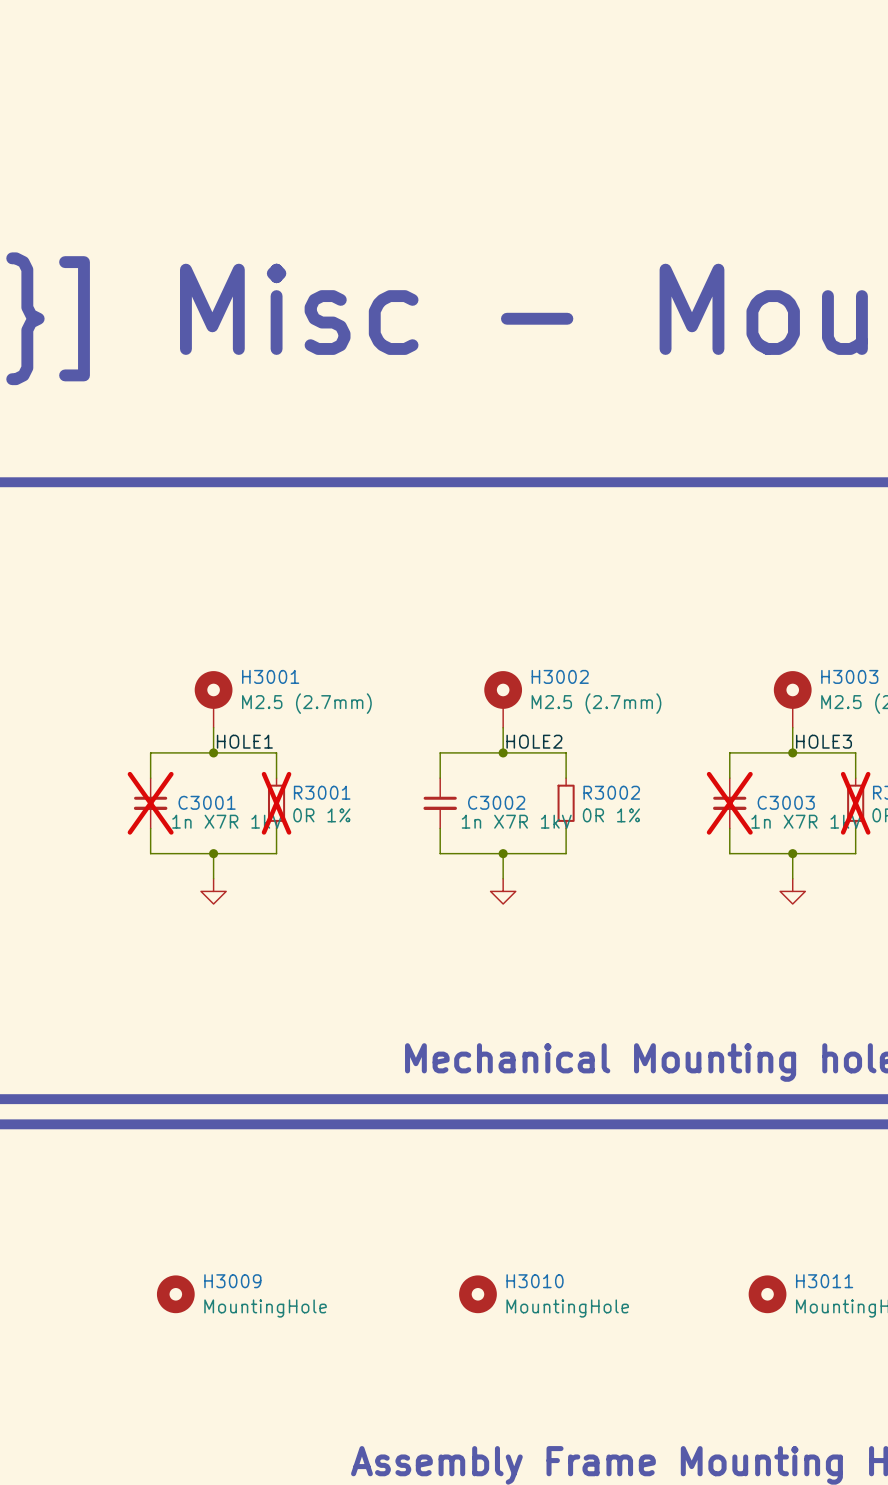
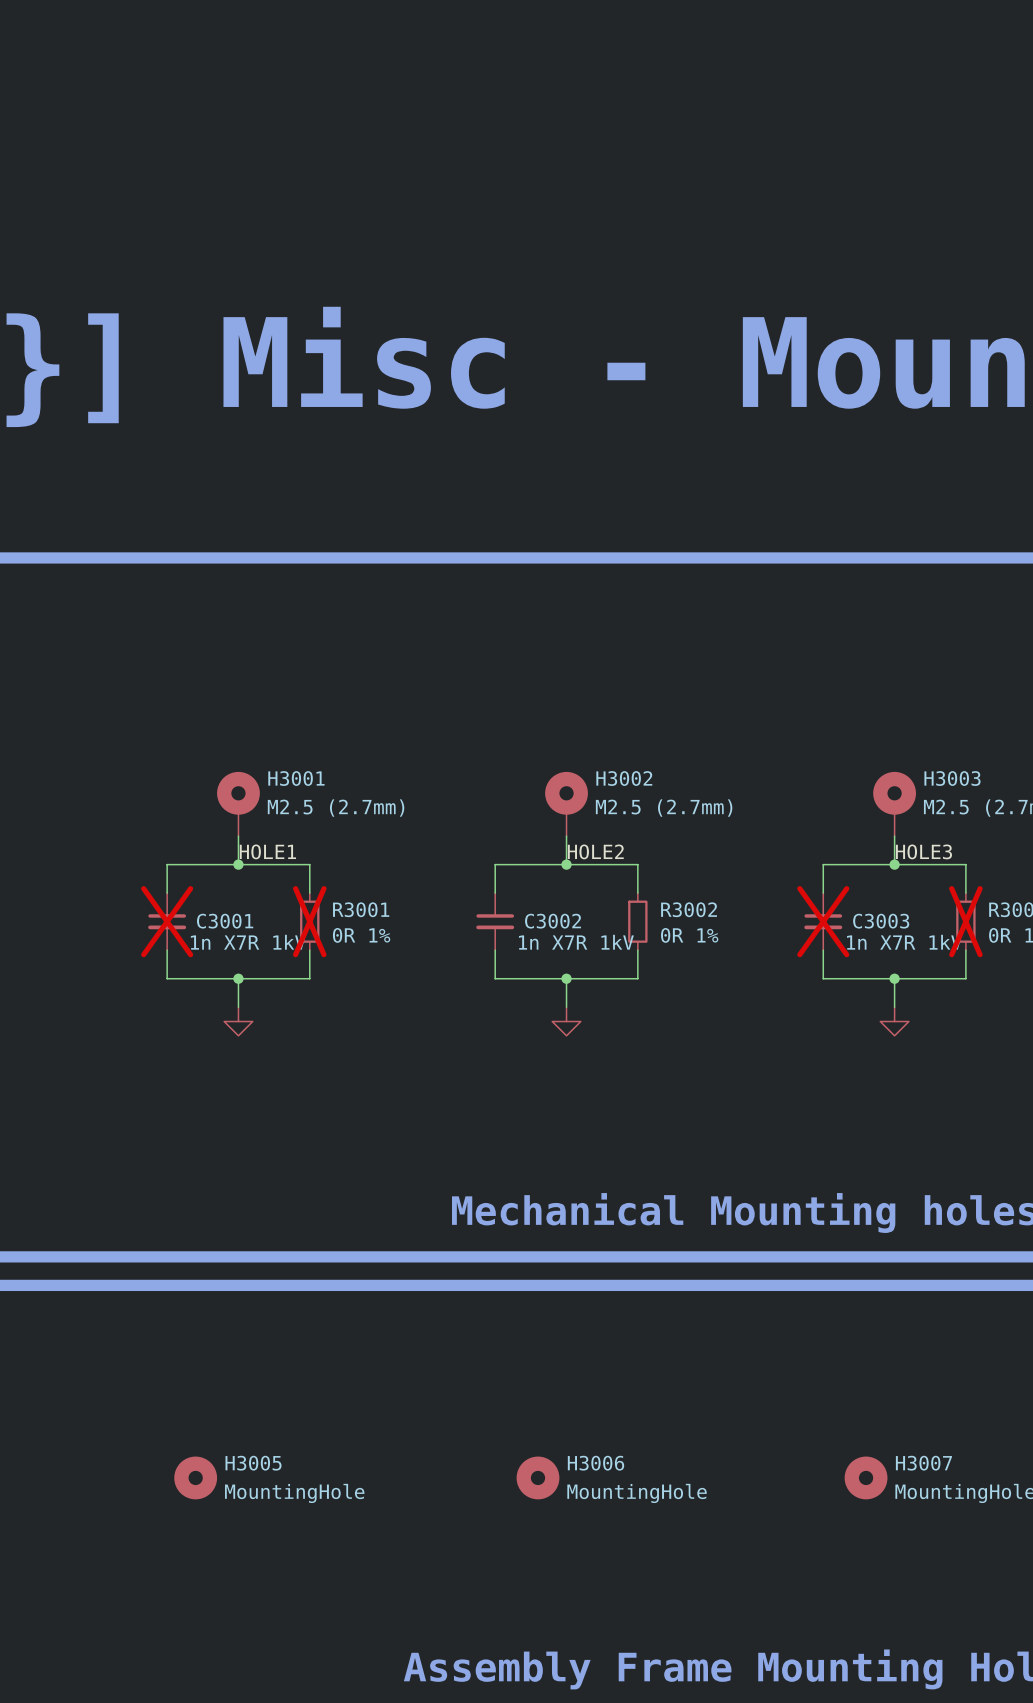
H3009 name: H3009 (232, 1281) -> H3005 (253, 1463)
H3010 name: H3010 (535, 1281) -> H3006 (595, 1463)
H3011 name: H3011 (824, 1281) -> H3007 (923, 1463)

